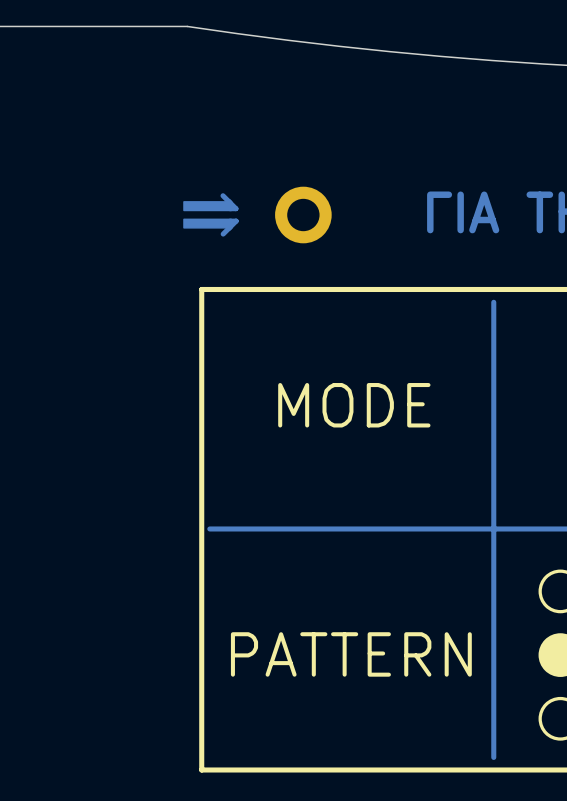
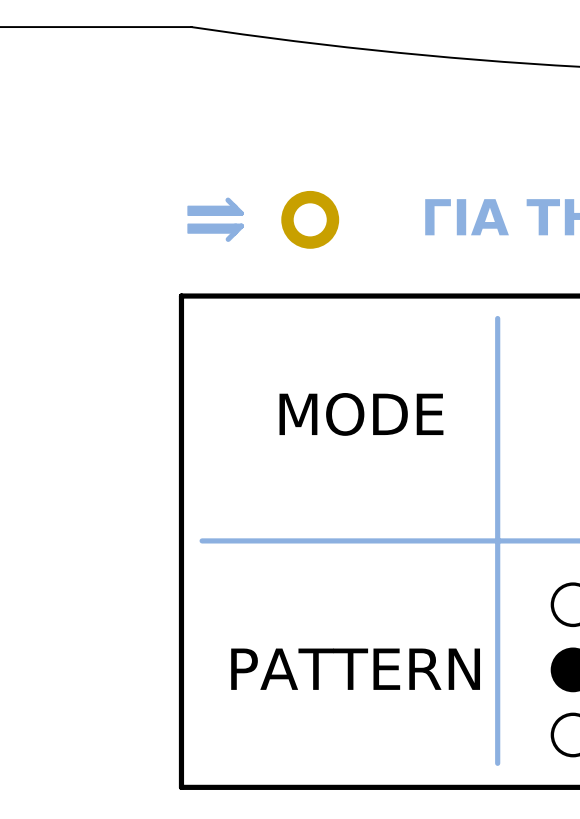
line: (201, 289) (201, 769) -> (206, 296) (181, 296) (181, 787) (206, 787)
bottom track: (493, 302) (493, 757) -> none
bottom track: none -> (497, 318) (497, 763)
bottom track: none -> (214, 540) (202, 540)

